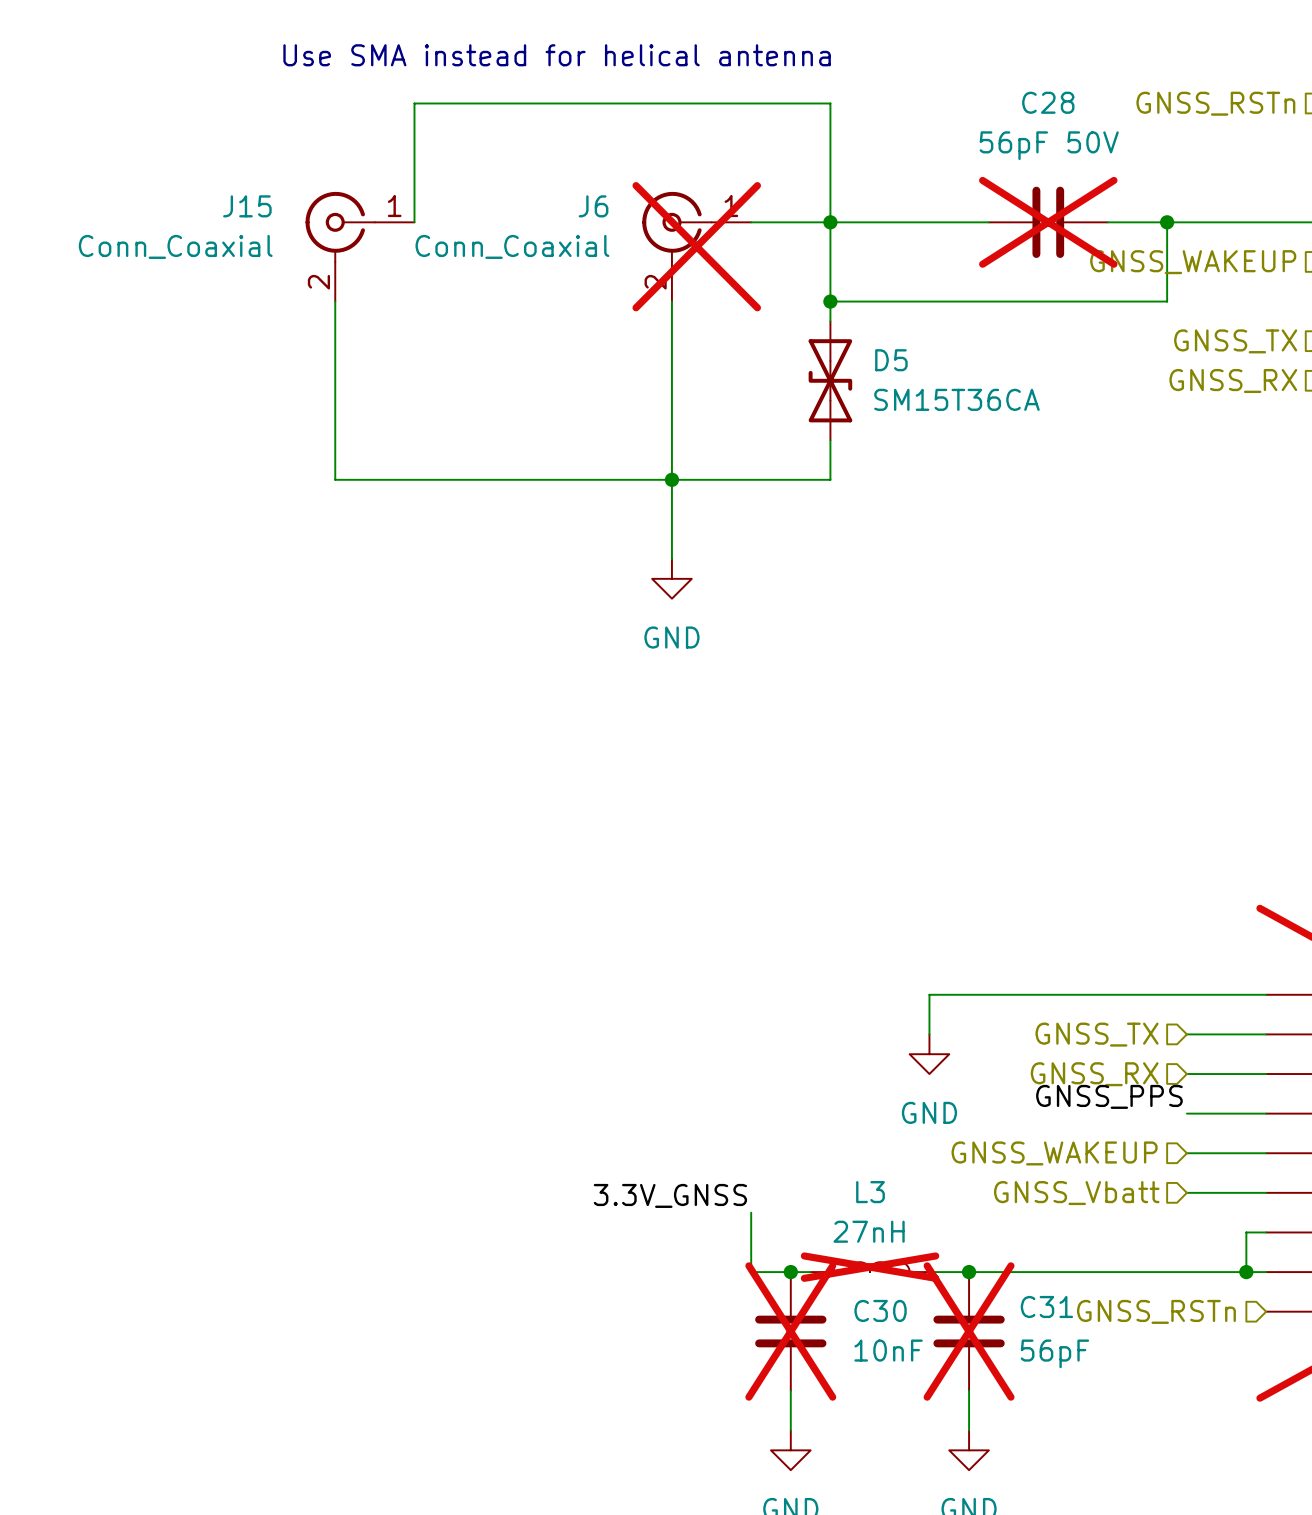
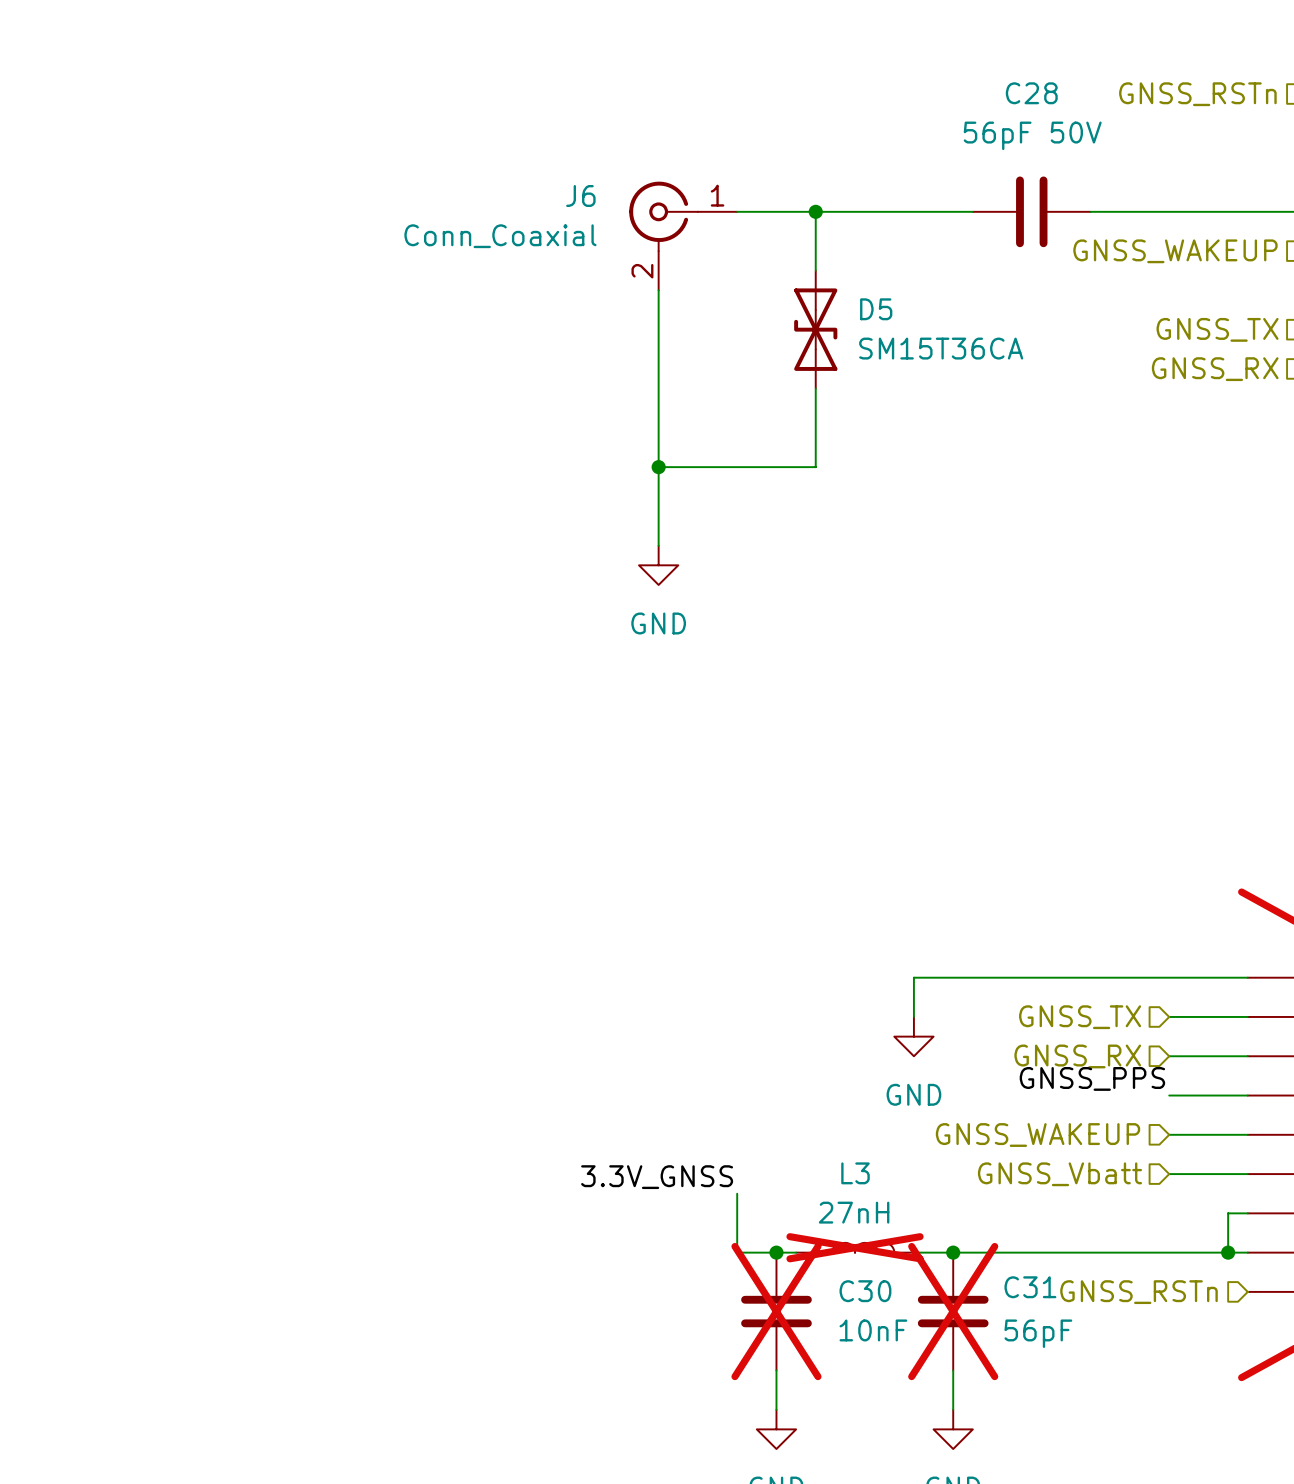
text: Use SMA instead for helical antenna (557, 55) -> none
wire: (414, 222) (414, 103) (830, 103) (830, 222) -> none
C28 do-not-place cross: (1048, 222) -> none
wire: (1167, 222) (1167, 301) (830, 301) -> none
junction: (1167, 222) -> none
J15: Conn_Coaxial (360, 246) -> none
J6 do-not-place cross: (696, 246) -> none
wire: (335, 301) (335, 479) (671, 479) -> none
junction: (830, 301) -> none
D5 position: (830, 380) -> (815, 329)

